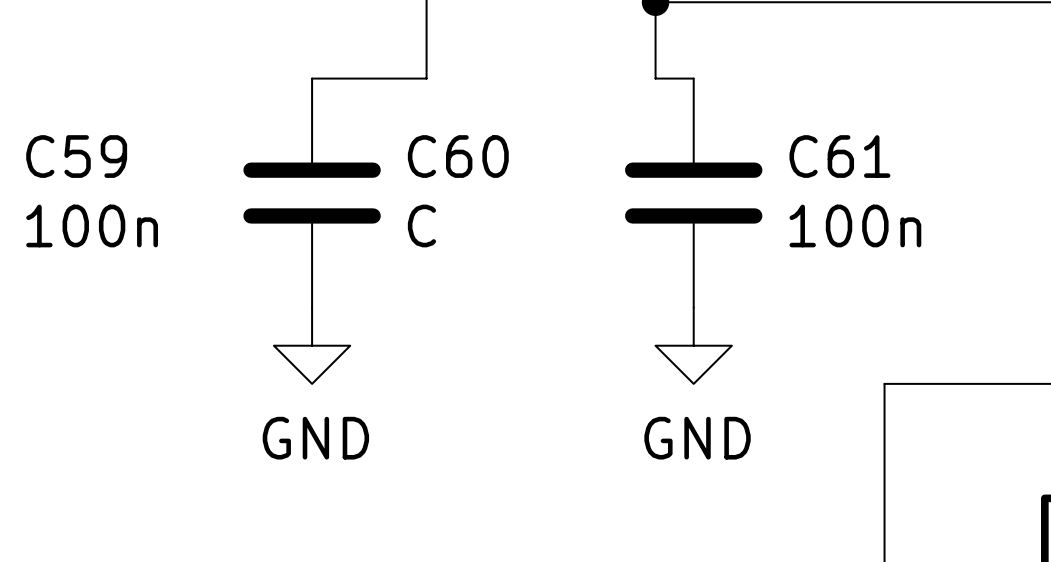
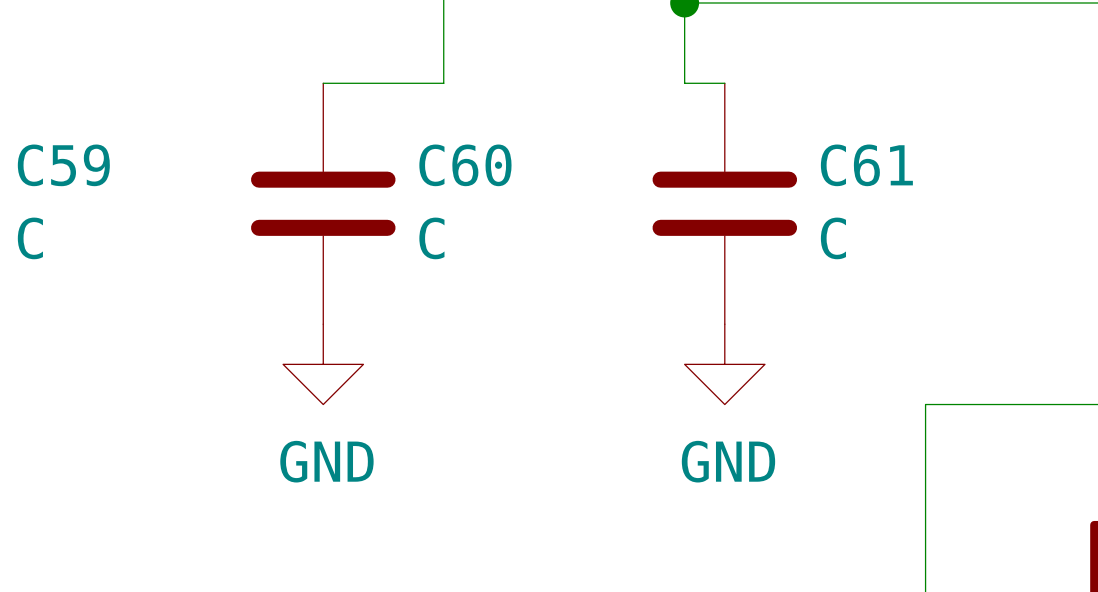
C59 value: 100n (92, 225) -> C (30, 238)
C61 value: 100n (855, 225) -> C (833, 238)

